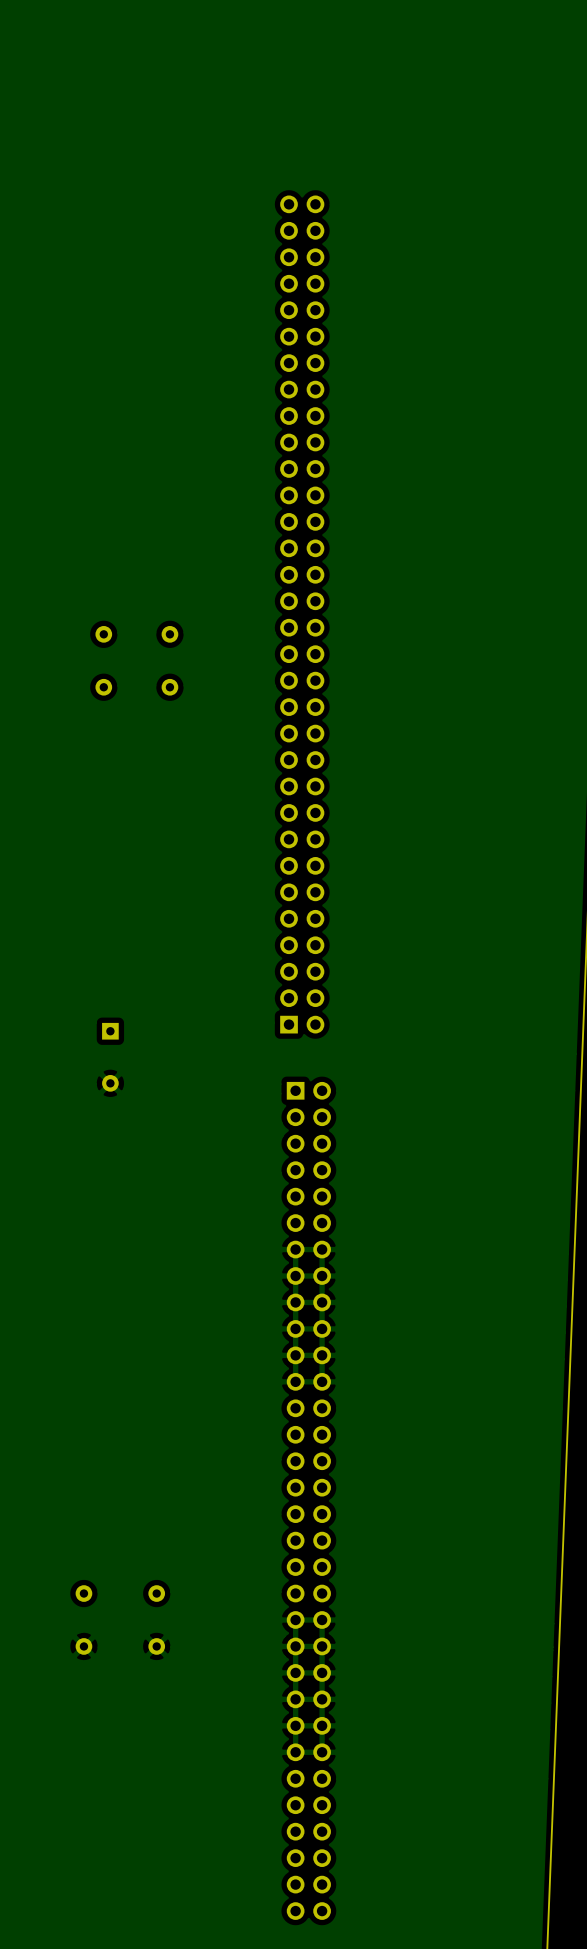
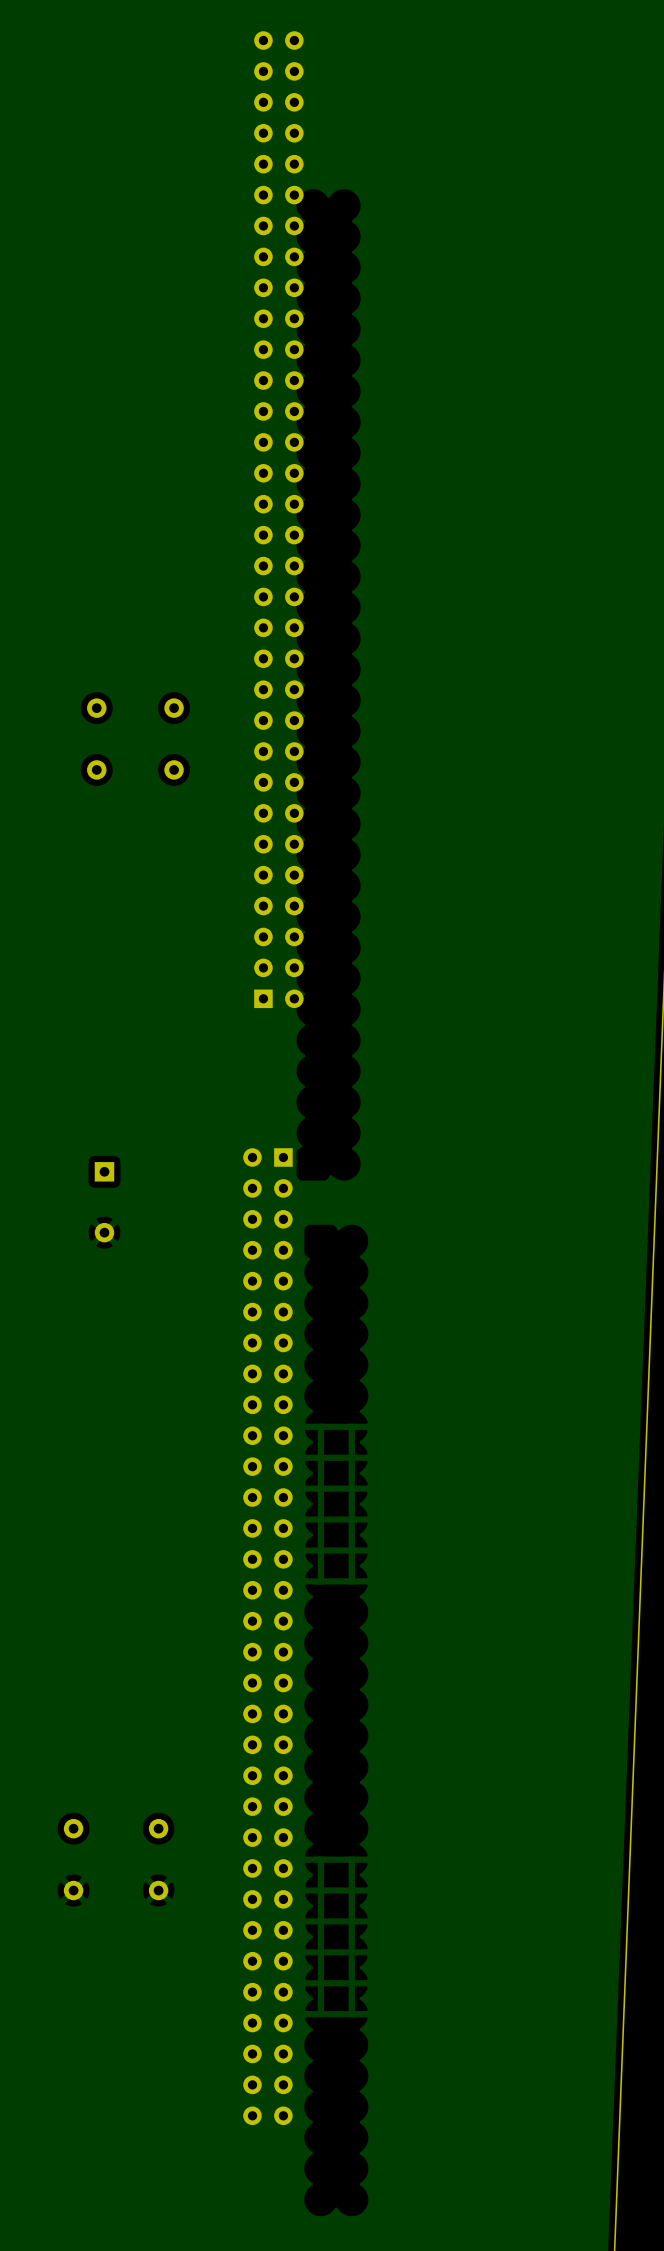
part: none -> (278, 519)
part: (302, 614) -> none
part: none -> (267, 1636)
part: (308, 1500) -> none

